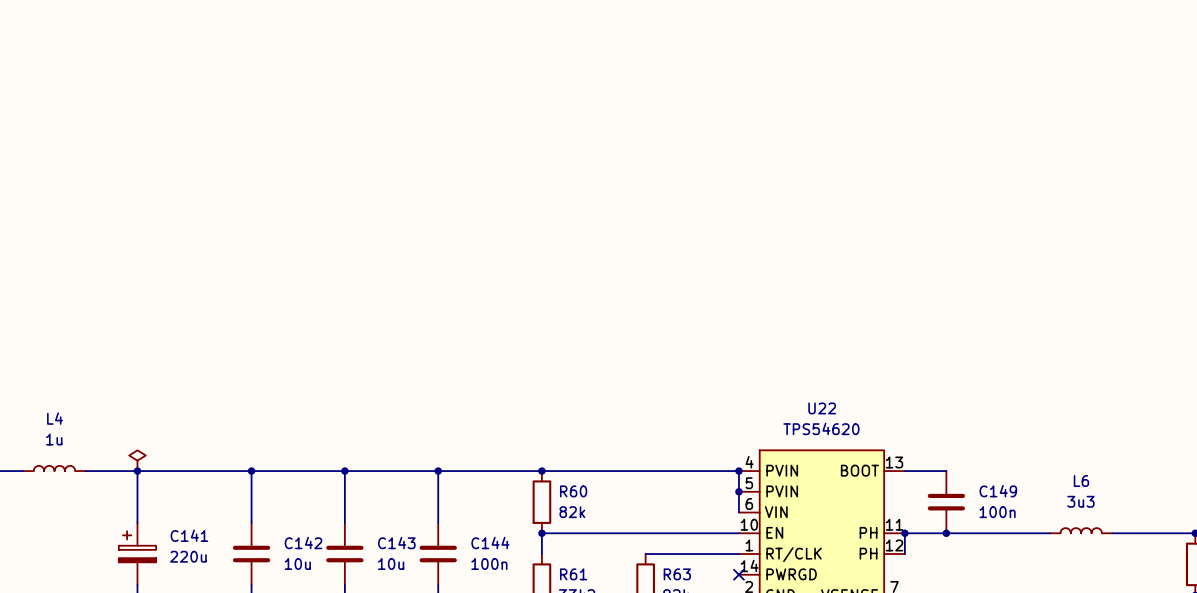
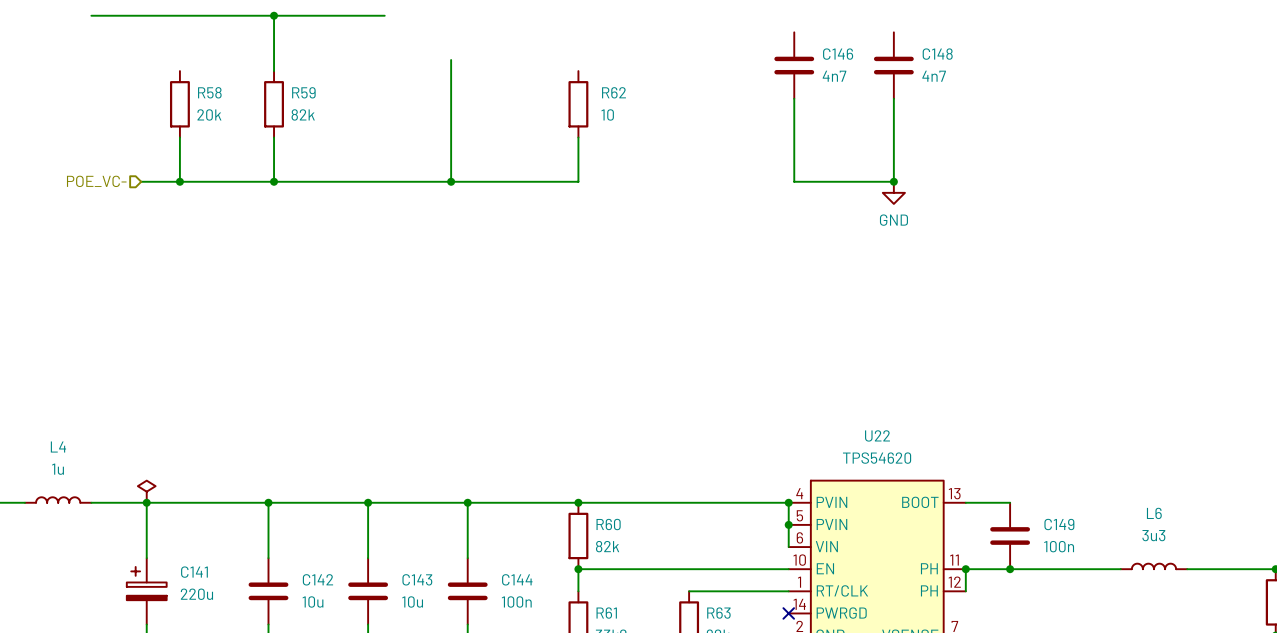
wire: none -> (91, 15) (384, 15)
wire: none -> (274, 15) (274, 71)
junction: none -> (274, 15)
wire: none -> (451, 60) (451, 181)
C146: none -> 4n7 (794, 65)
C148: none -> 4n7 (893, 65)
wire: none -> (794, 98) (794, 181) (893, 181) (893, 98)
R58: none -> 20k (179, 104)
R59: none -> 82k (274, 104)
R62: none -> 10 (578, 104)
wire: none -> (179, 137) (179, 181)
wire: none -> (274, 137) (274, 181)
wire: none -> (578, 137) (578, 181) (141, 181)
hierarchical label: none -> POE_VC- (96, 181)
junction: none -> (179, 181)
junction: none -> (274, 181)
junction: none -> (451, 181)
junction: none -> (893, 181)
power symbol: none -> GND (893, 192)

